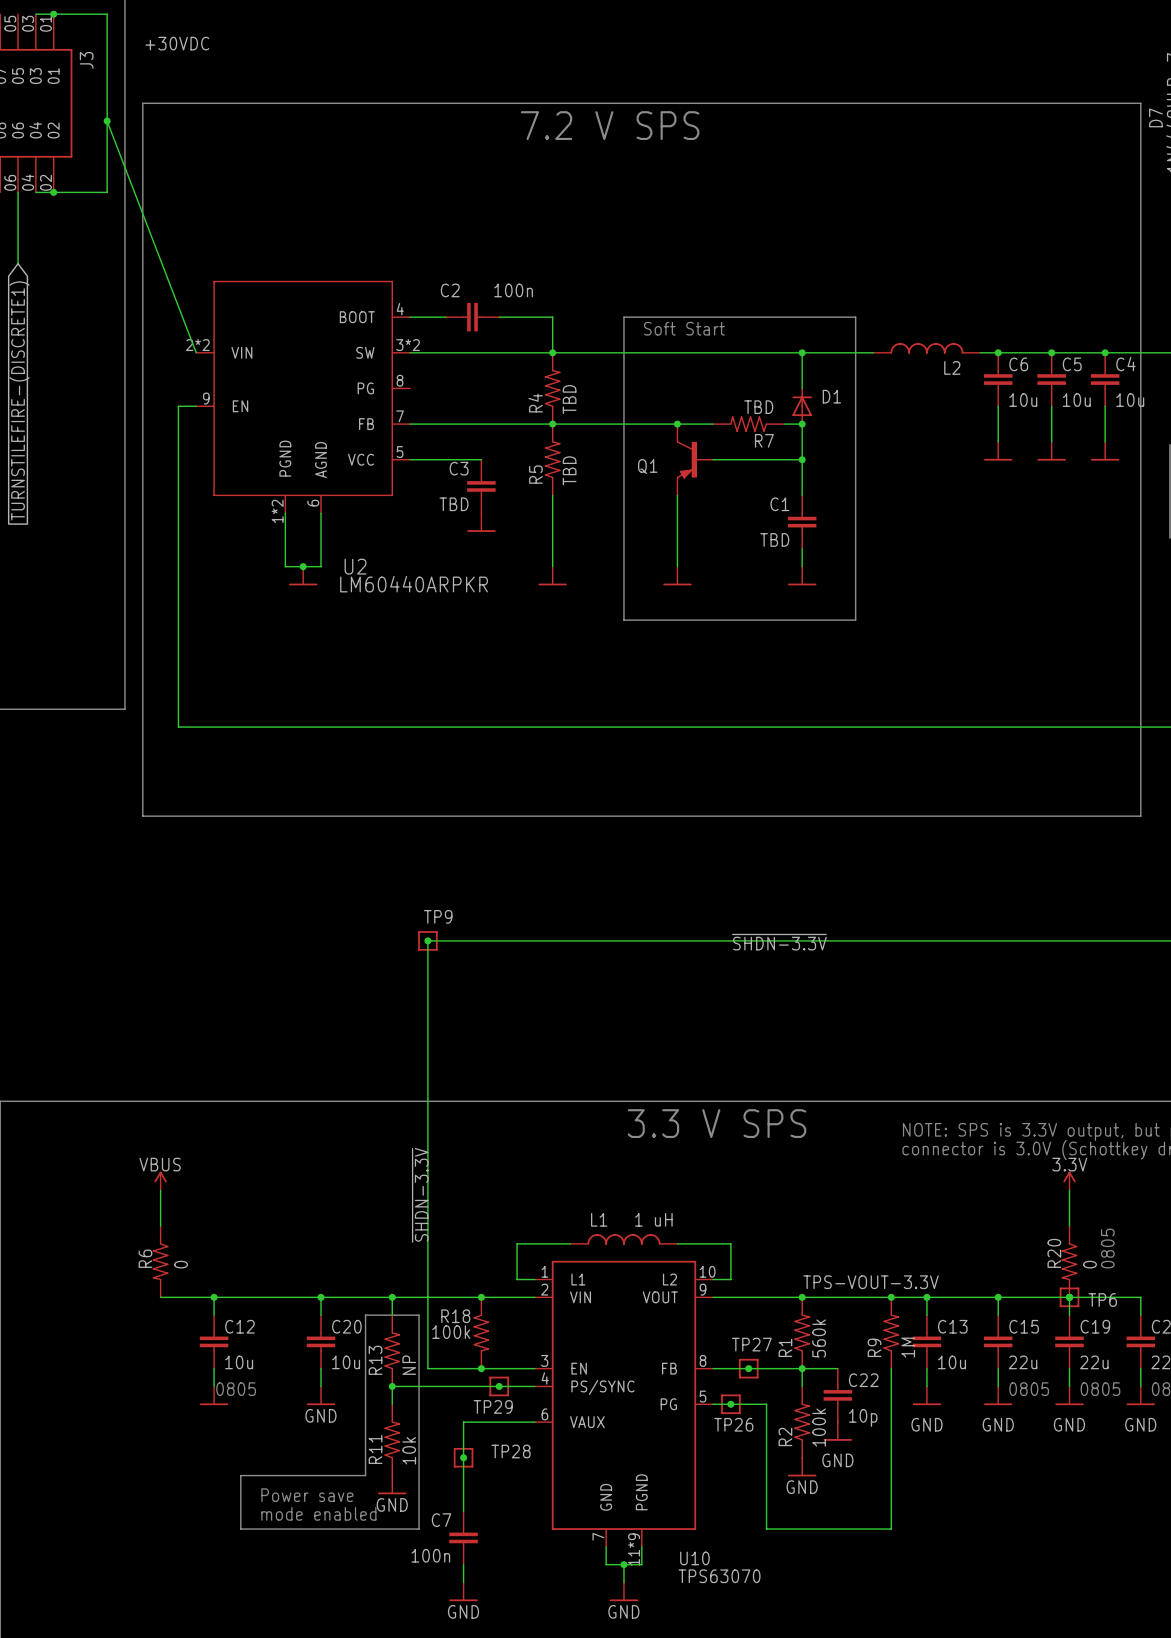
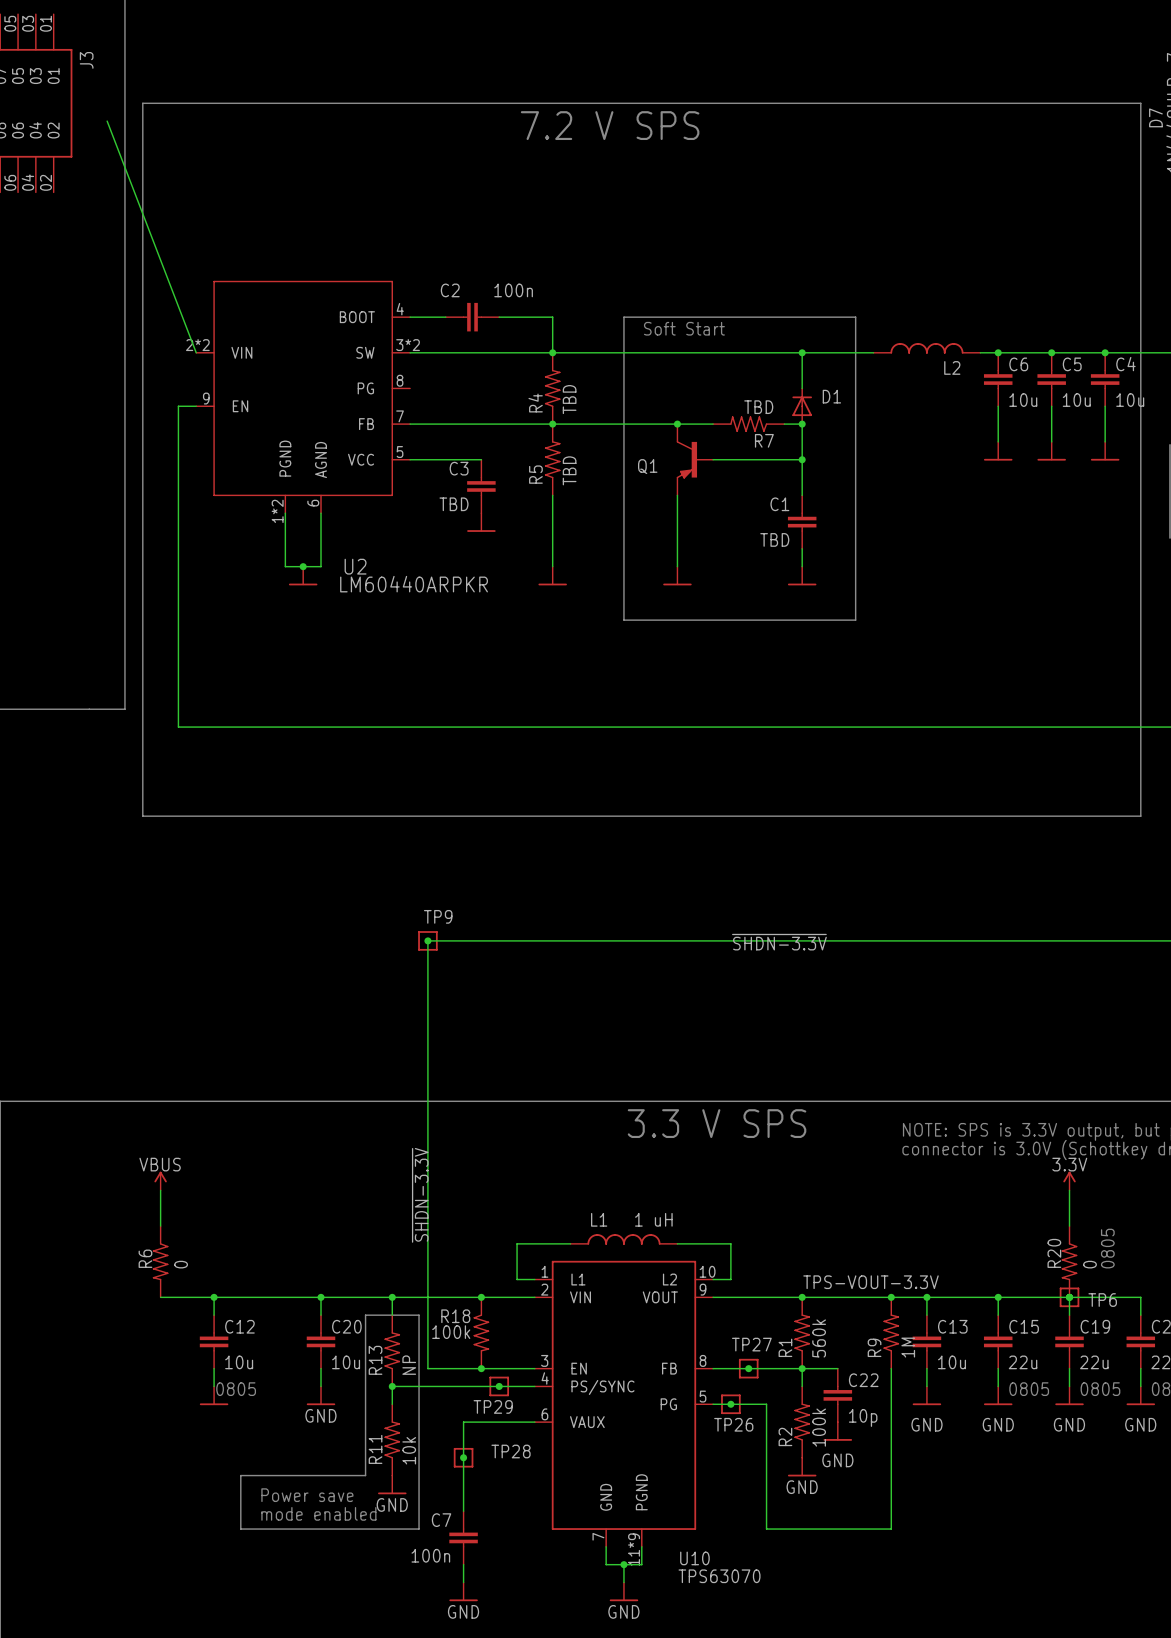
wire: (35, 14) (107, 14) (107, 192) (35, 192) -> none
junction: (53, 14) -> none
label: +30VDC (177, 43) -> none
junction: (107, 121) -> none
wire: (18, 192) (18, 263) -> none
junction: (53, 192) -> none
global label: TURNSTILEFIRE-(DISCRETE1) (19, 400) -> none

